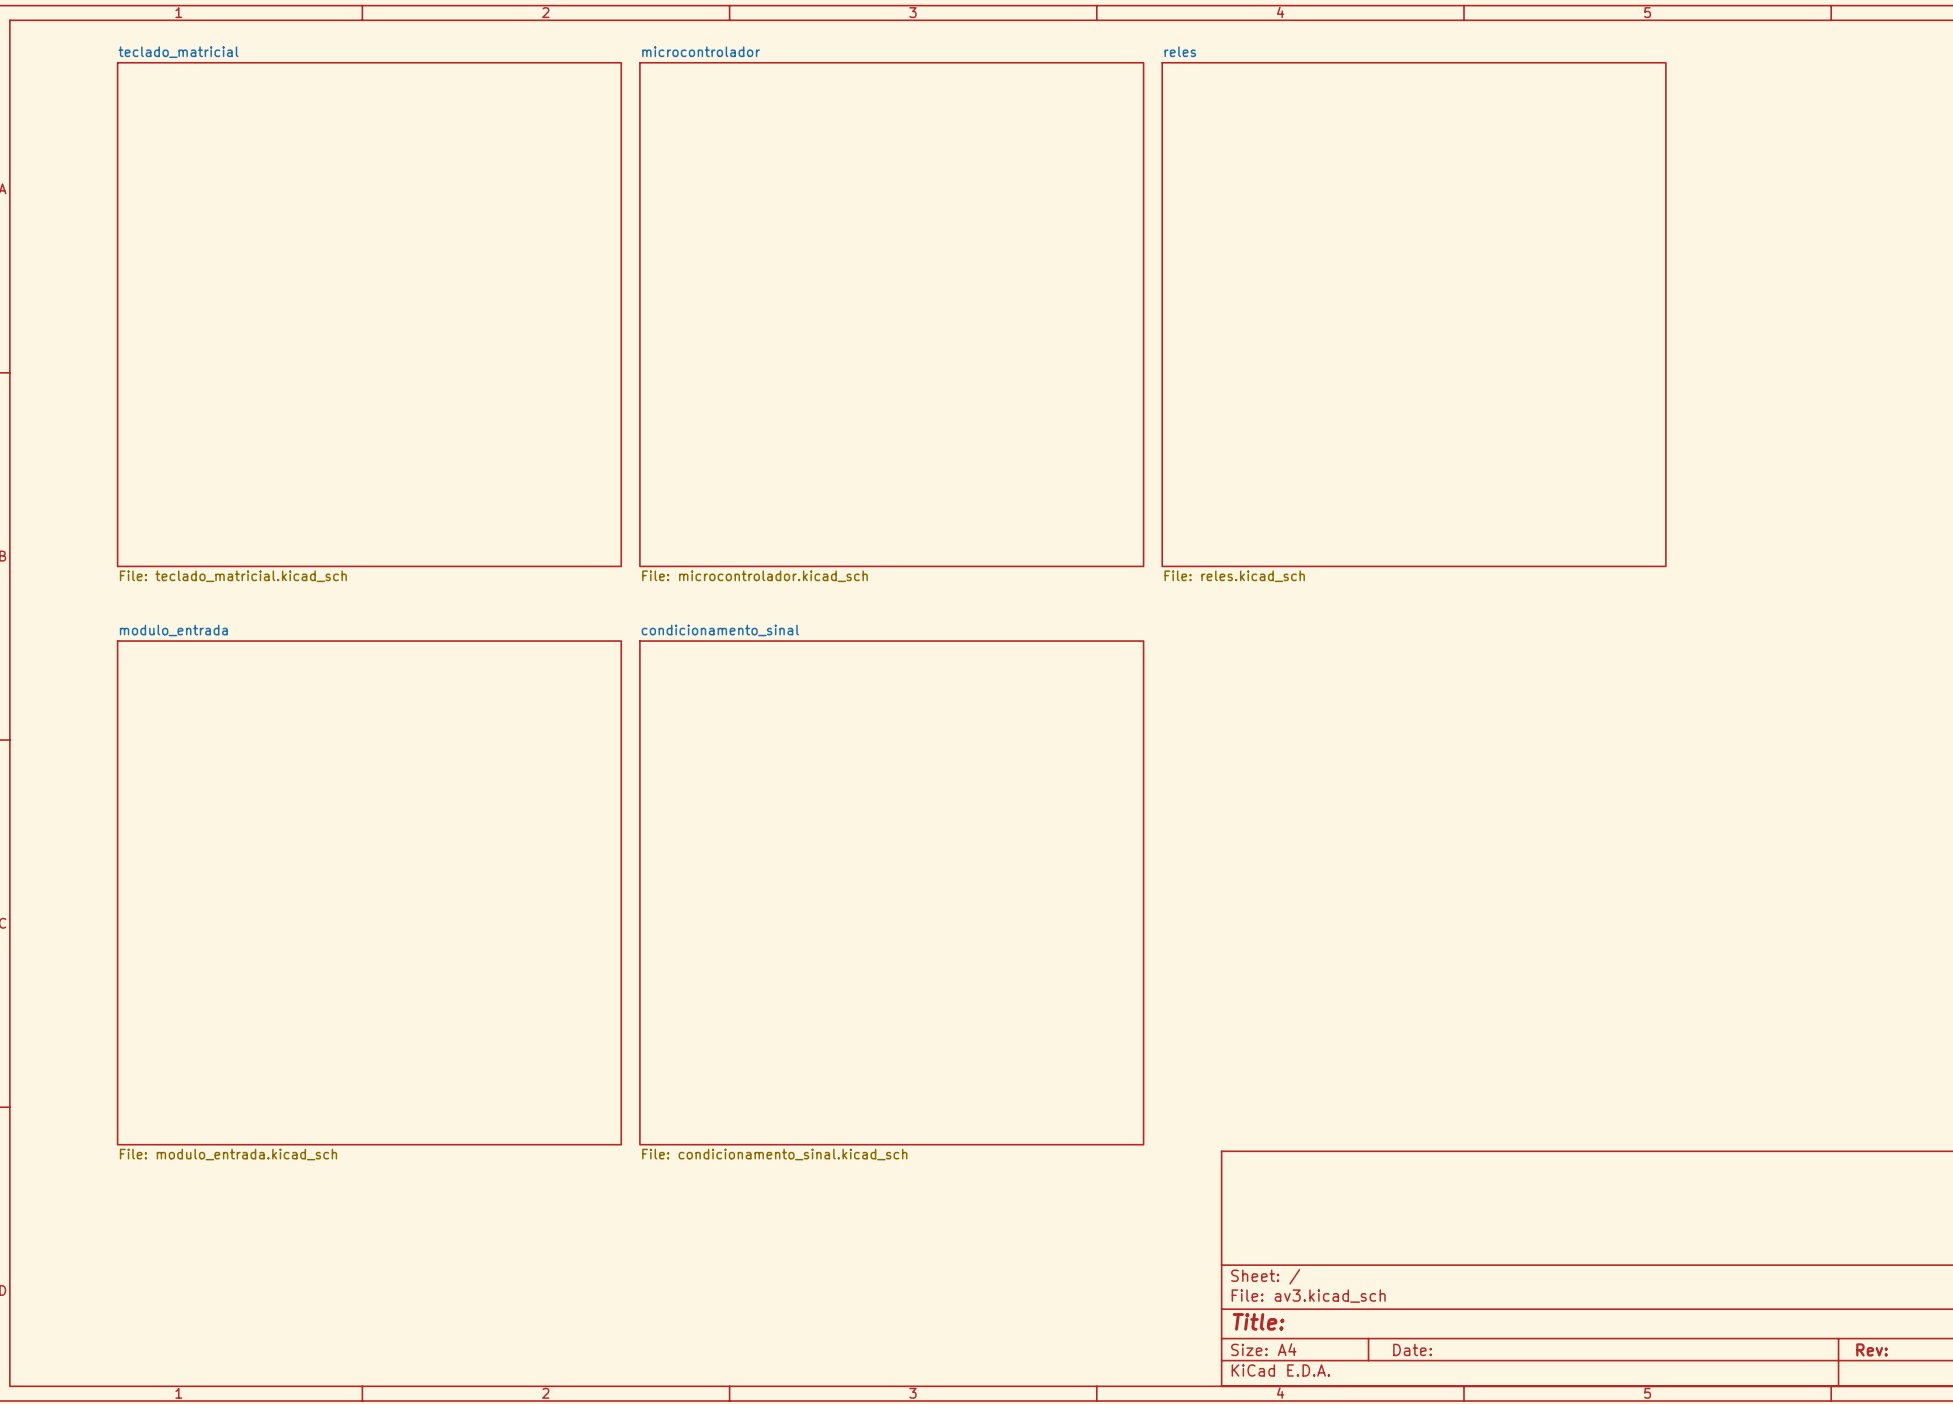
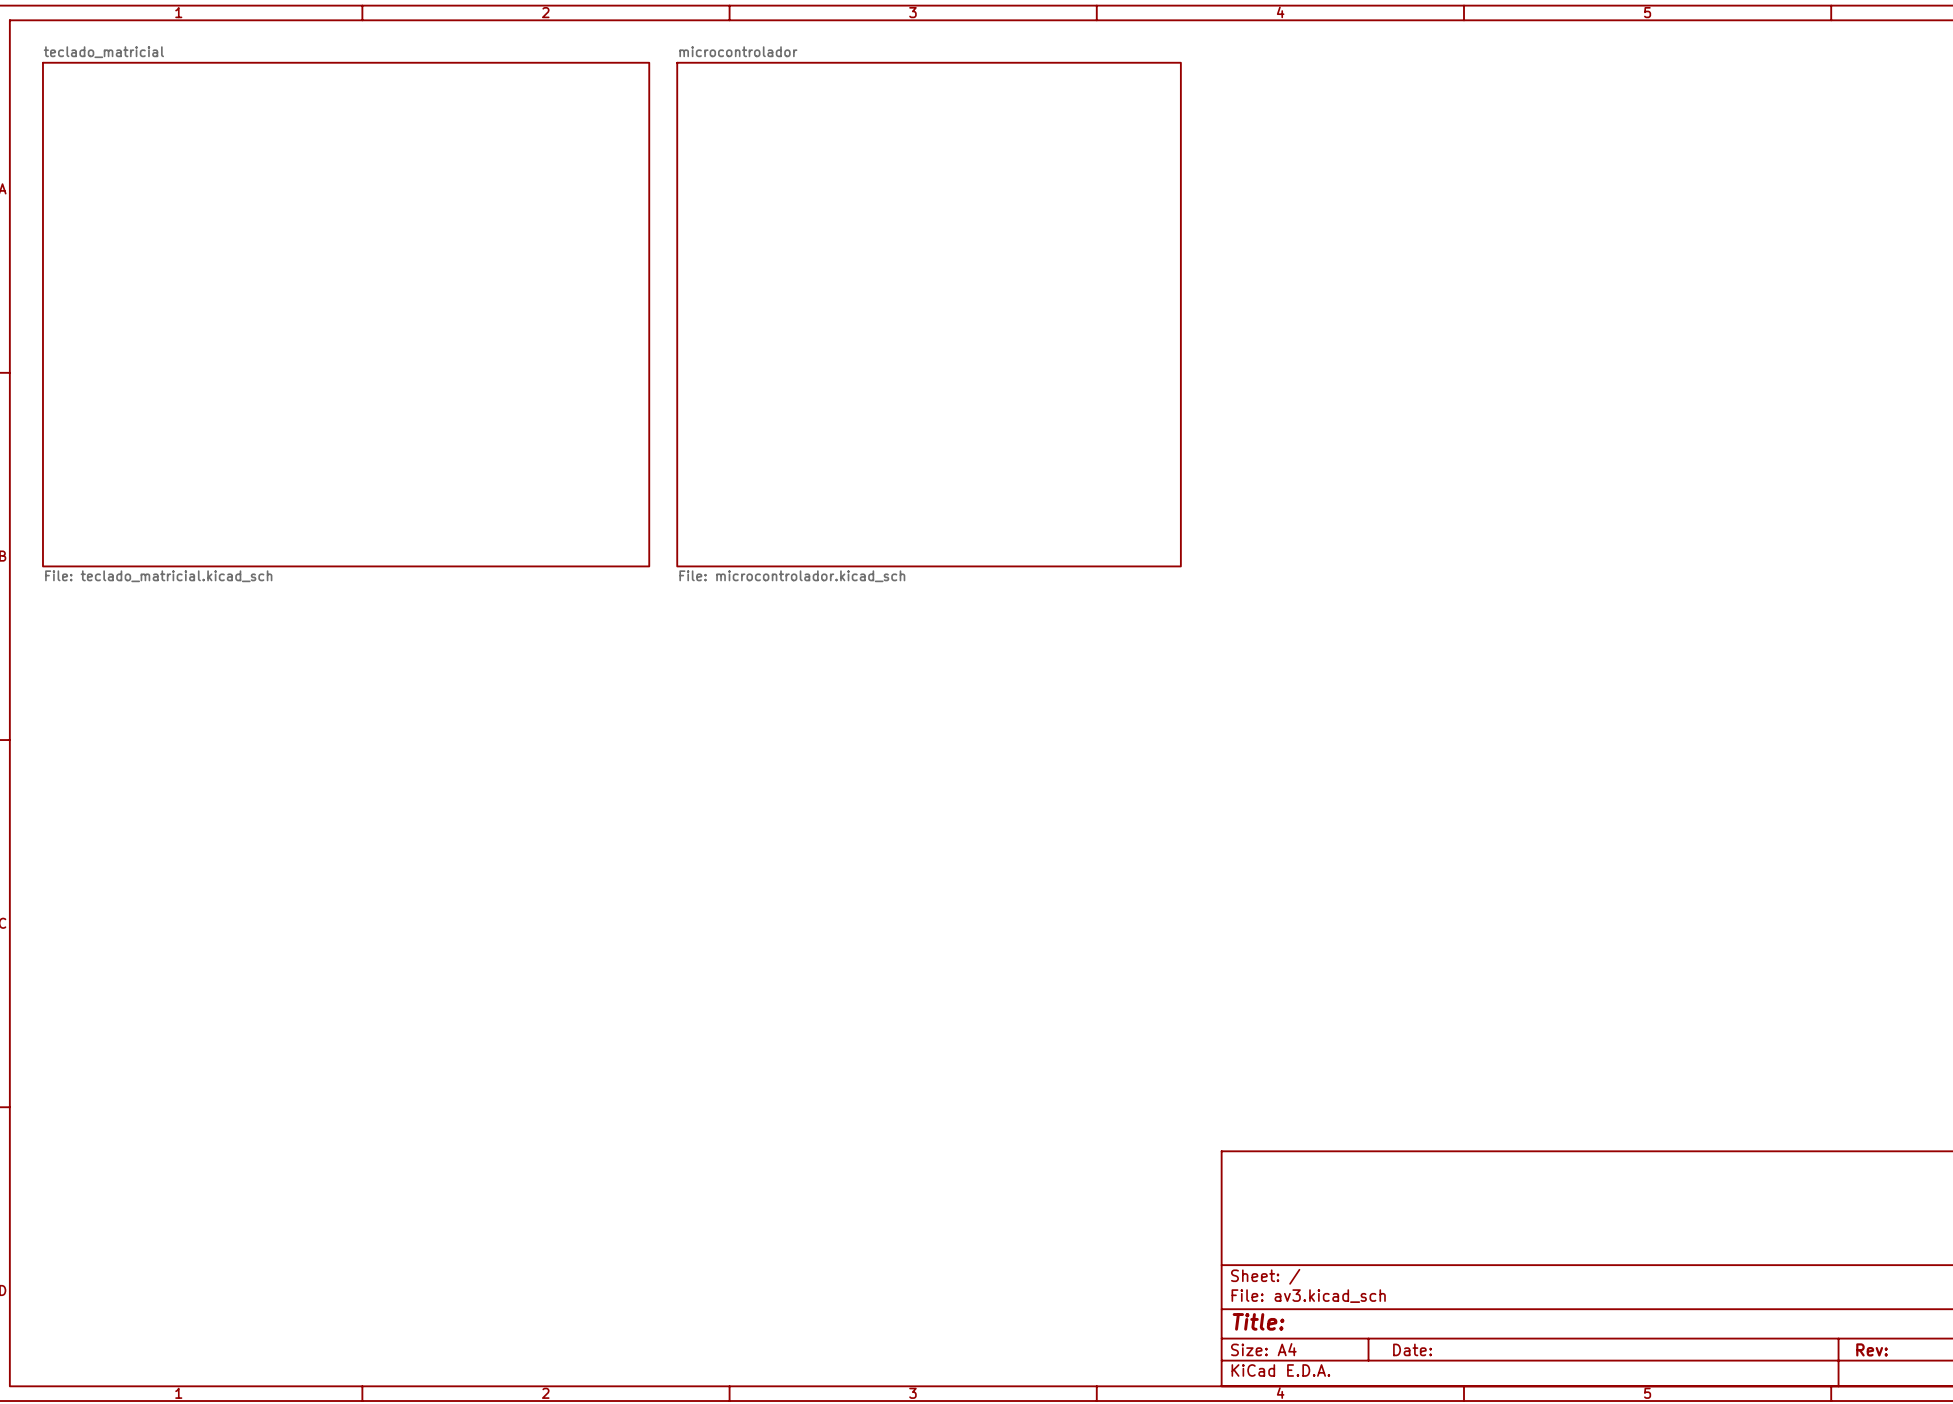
sheet teclado_matricial: none -> File: teclado_matricial.kicad_sch (346, 314)
sheet teclado_matricial: File: teclado_matricial.kicad_sch (369, 314) -> none
sheet microcontrolador position: (891, 314) -> (929, 314)
sheet reles: File: reles.kicad_sch (1414, 314) -> none
sheet modulo_entrada: File: modulo_entrada.kicad_sch (369, 892) -> none
sheet condicionamento_sinal: File: condicionamento_sinal.kicad_sch (891, 892) -> none

